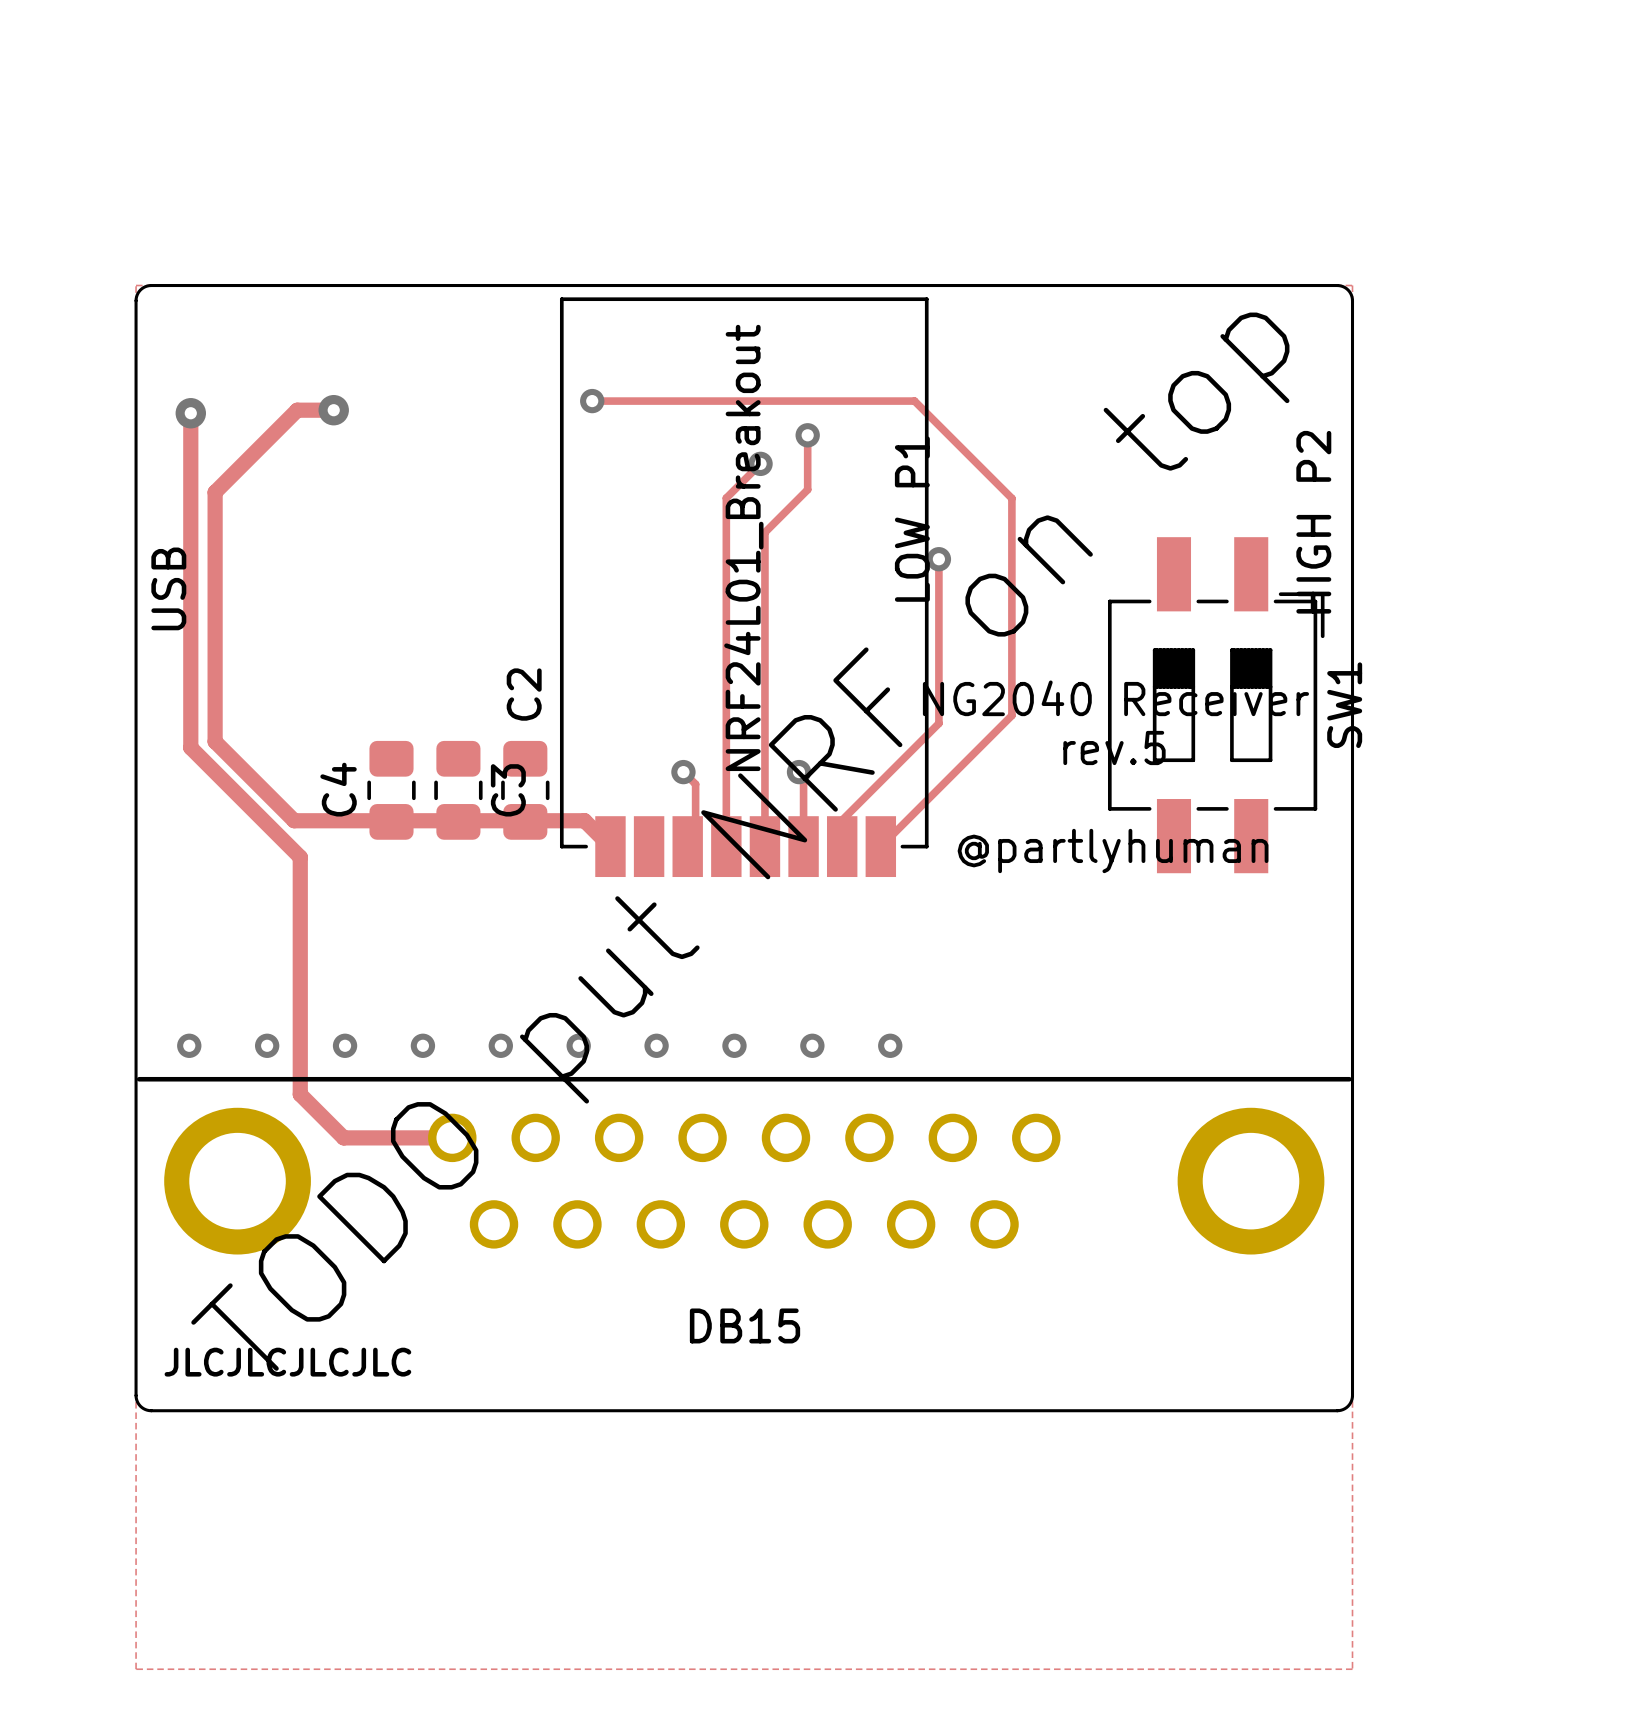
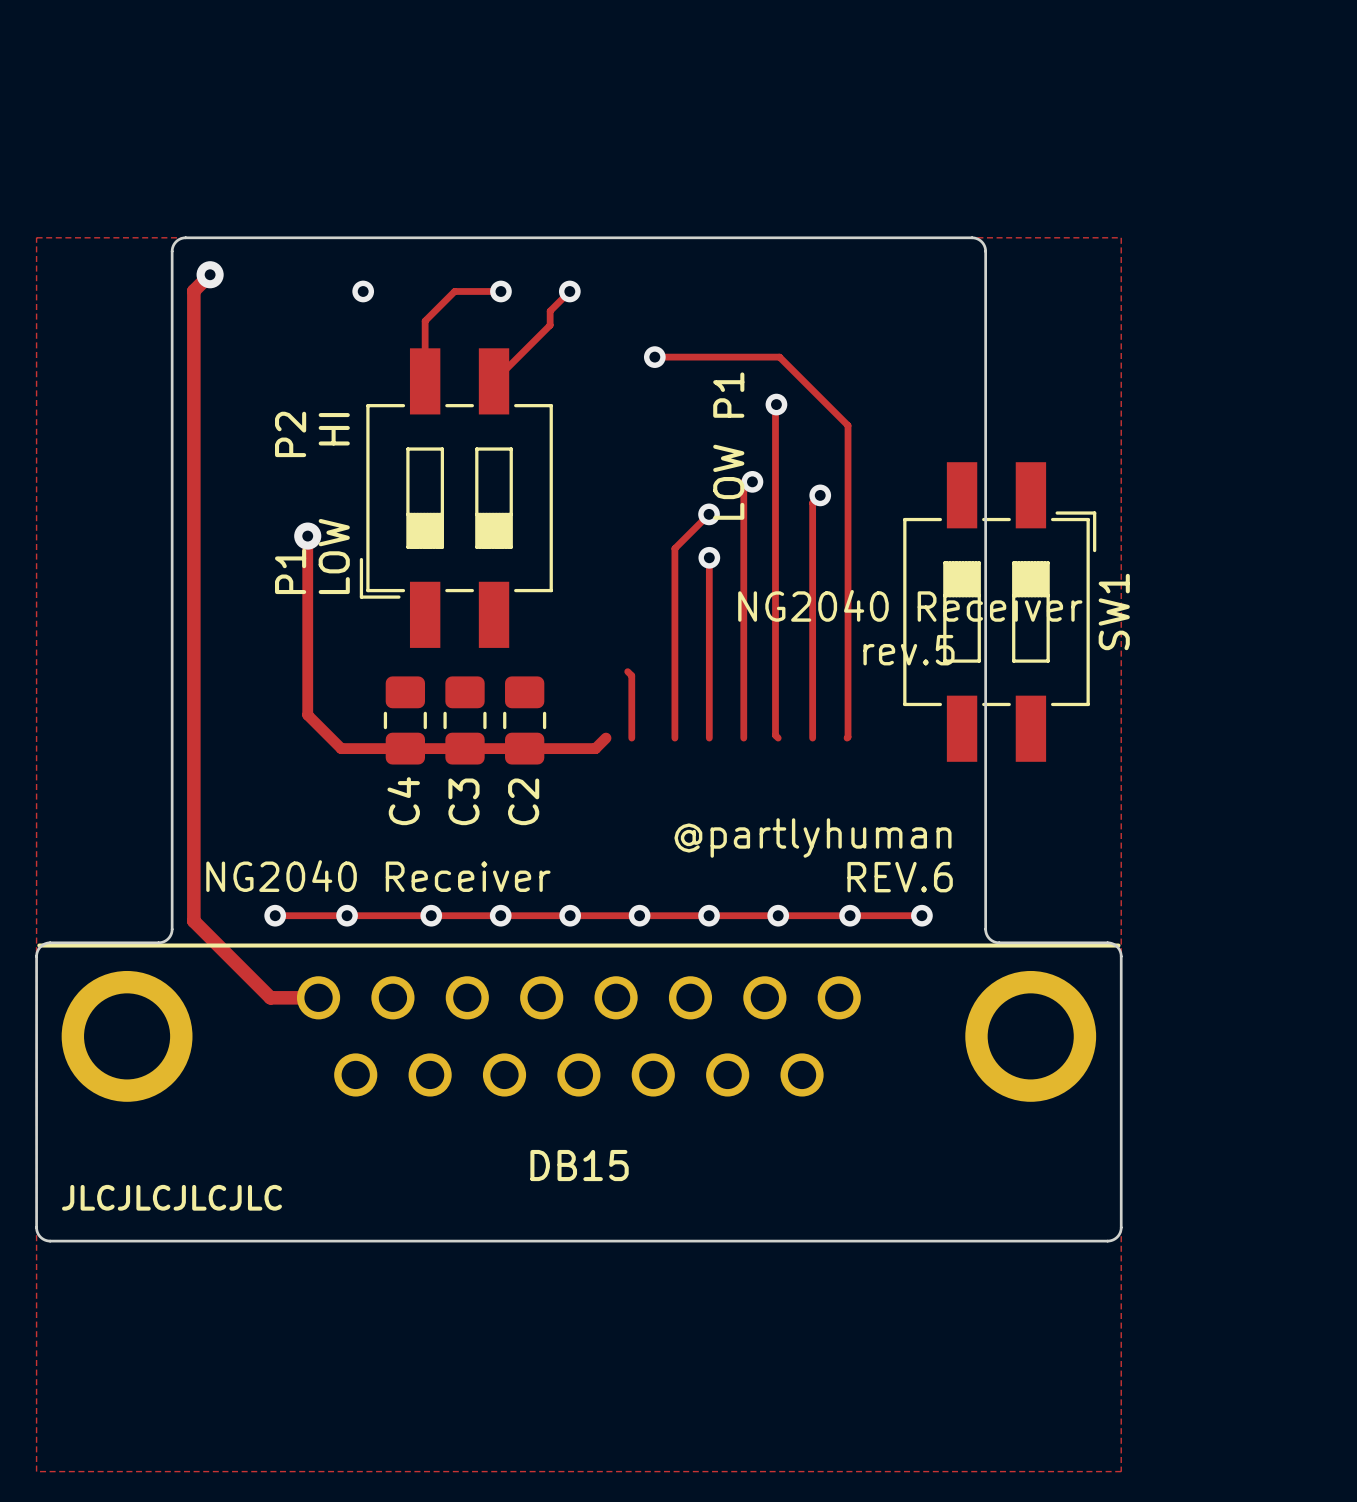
board edge: (303, 285) (149, 285) (140, 289) (136, 296) (136, 1091) -> (185, 237) (176, 241) (172, 251) (171, 932) (166, 940) (160, 942) (48, 942) (40, 946) (36, 956)
board edge: (1185, 285) (1339, 285) (1346, 288) (1351, 296) (1352, 1091) -> (972, 237) (981, 241) (985, 251) (986, 932) (990, 940) (997, 942) (1109, 942) (1117, 946) (1121, 956)
via: none -> (210, 274)
via: none -> (363, 291)
track: none -> (500, 291) (454, 291) (425, 321) (425, 381)
via: none -> (500, 291)
track: none -> (569, 291) (550, 311) (550, 325) (494, 381)
via: none -> (569, 291)
track: (592, 401) (914, 401) (1011, 498) (1011, 715) (880, 846) -> none
via: (592, 401) -> none
track: (333, 410) (297, 410) (215, 492) (215, 741) (294, 820) (584, 820) (610, 846) -> none
via: (333, 410) -> none
track: (190, 413) (190, 747) (300, 857) (300, 1094) (343, 1137) (398, 1137) -> (210, 274) (193, 291) (193, 921) (270, 997)
via: (190, 413) -> none
track: none -> (654, 357) (779, 357) (848, 425) (847, 738)
track: (807, 435) (807, 489) (764, 532) (764, 846) -> none
via position: (807, 435) -> (654, 357)
track: (760, 463) (726, 498) (726, 846) -> none
via: (760, 463) -> none
track: none -> (776, 404) (775, 735) (778, 738)
via: none -> (776, 404)
text: none -> HI (334, 429)
text: none -> P2 (290, 434)
text: HIGH P2 (1313, 522) -> none
track: none -> (743, 481) (743, 738)
track: (938, 559) (938, 723) (842, 820) (842, 846) -> none
track: none -> (820, 495) (812, 502) (812, 738)
via: none -> (820, 495)
part: none -> (456, 498)
part: NRF24L01_Breakout (744, 587) -> none
text: USB (168, 588) -> none
track: none -> (709, 514) (674, 548) (674, 738)
via: none -> (709, 514)
track: none -> (307, 536) (307, 715) (341, 748) (595, 748) (606, 738)
via: none -> (307, 536)
text: none -> LOW (334, 556)
track: none -> (709, 557) (709, 738)
via: none -> (709, 557)
text: none -> P1 (290, 571)
C2 name position: C2 (524, 694) -> C2 (523, 801)
track: (683, 772) (695, 784) (695, 832) (687, 840) (687, 846) -> none
via: (683, 772) -> none
via: (799, 772) -> none
C4 name position: C4 (338, 789) -> C4 (403, 801)
C4 position: (391, 790) -> (405, 720)
C3 position: (458, 790) -> (465, 720)
C3 name position: C3 (508, 790) -> C3 (463, 801)
C2 position: (525, 790) -> (524, 720)
text: TODO put NRF on top (740, 841) -> none
text position: @partlyhuman (1113, 850) -> @partlyhuman (812, 838)
text: none -> NG2040 Receiver (378, 876)
text: none -> REV.6 (900, 877)
via: (189, 1045) -> none
via: (267, 1045) -> none
via: (345, 1045) -> none
track: none -> (275, 915) (921, 915)
via position: (422, 1045) -> (275, 915)
via position: (500, 1045) -> (347, 915)
via: none -> (778, 915)
via: none -> (850, 915)
via: none -> (921, 915)

